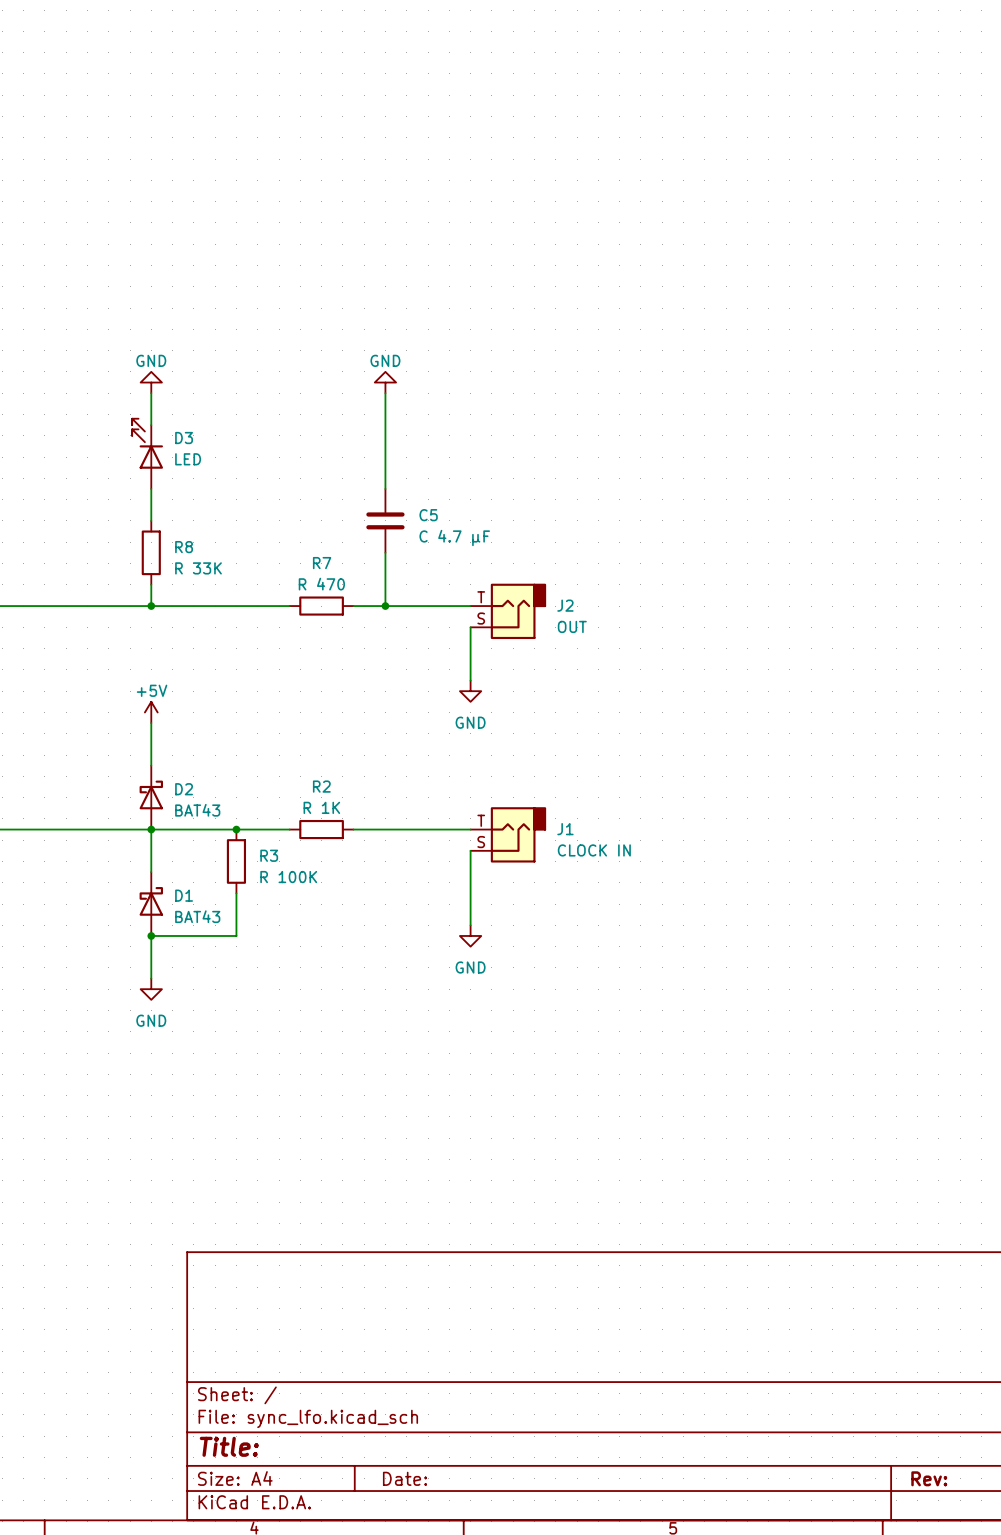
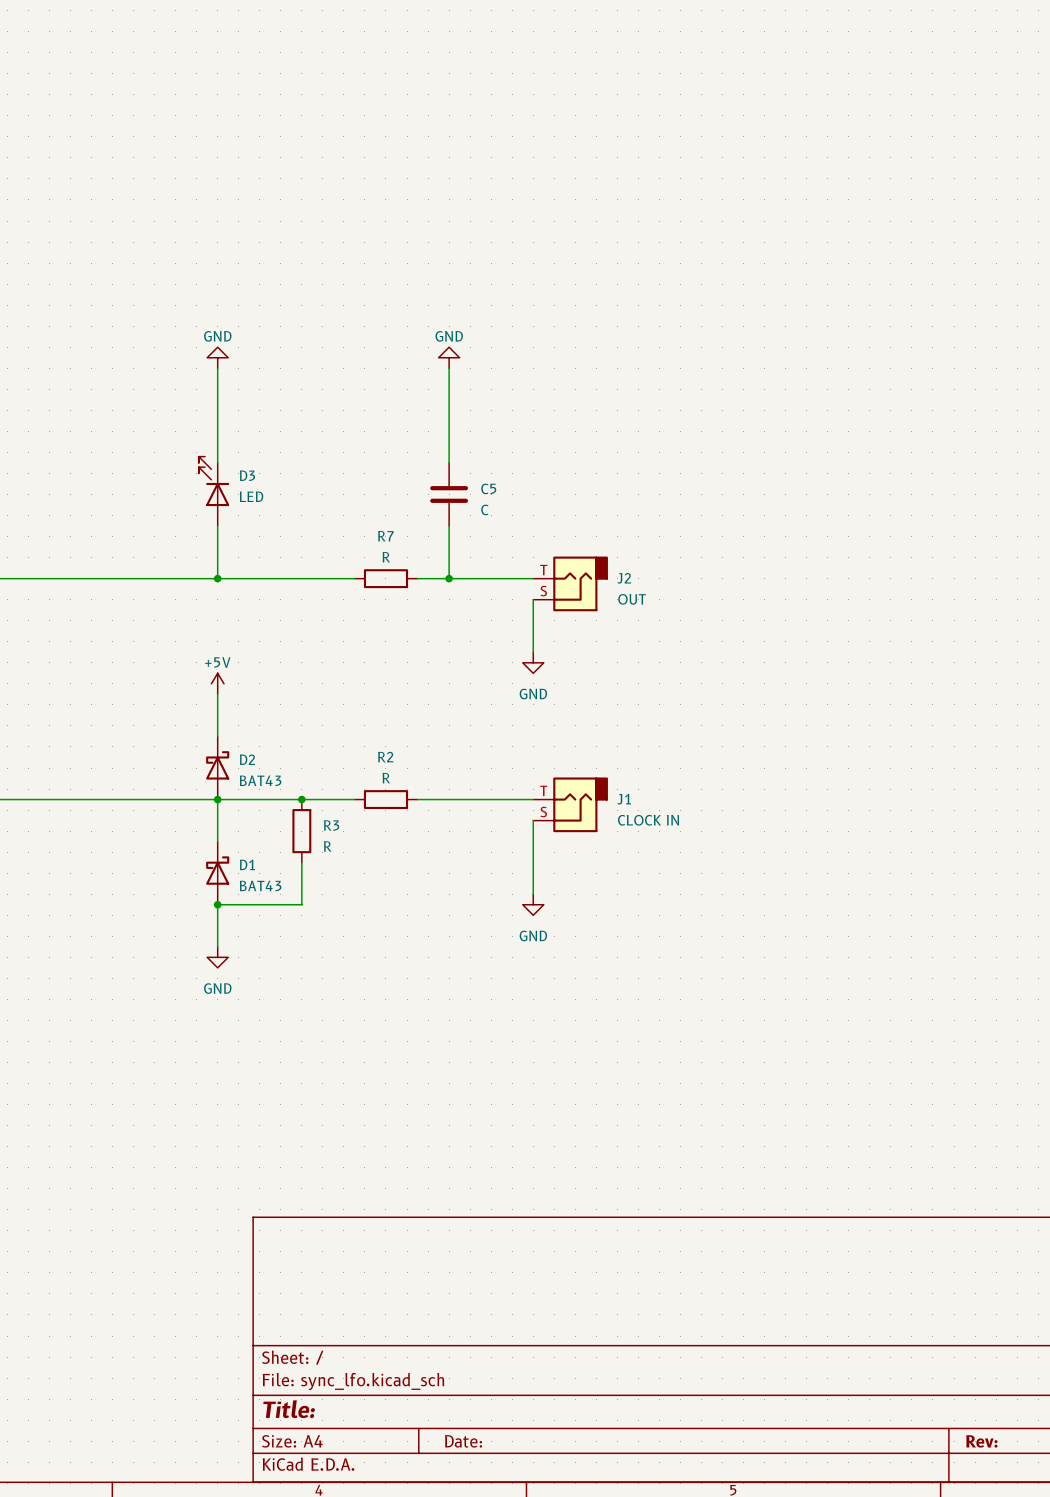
D3 position: (147, 453) -> (214, 491)
C5 value: C 4.7 µF (454, 537) -> C (484, 509)
wire: none -> (217, 526) (217, 557)
R8: R 33K (151, 552) -> none
R7 value: R 470 (321, 584) -> R (386, 557)
R2 value: R 1K (321, 807) -> R (386, 778)
R3 value: R 100K (288, 877) -> R (327, 846)

